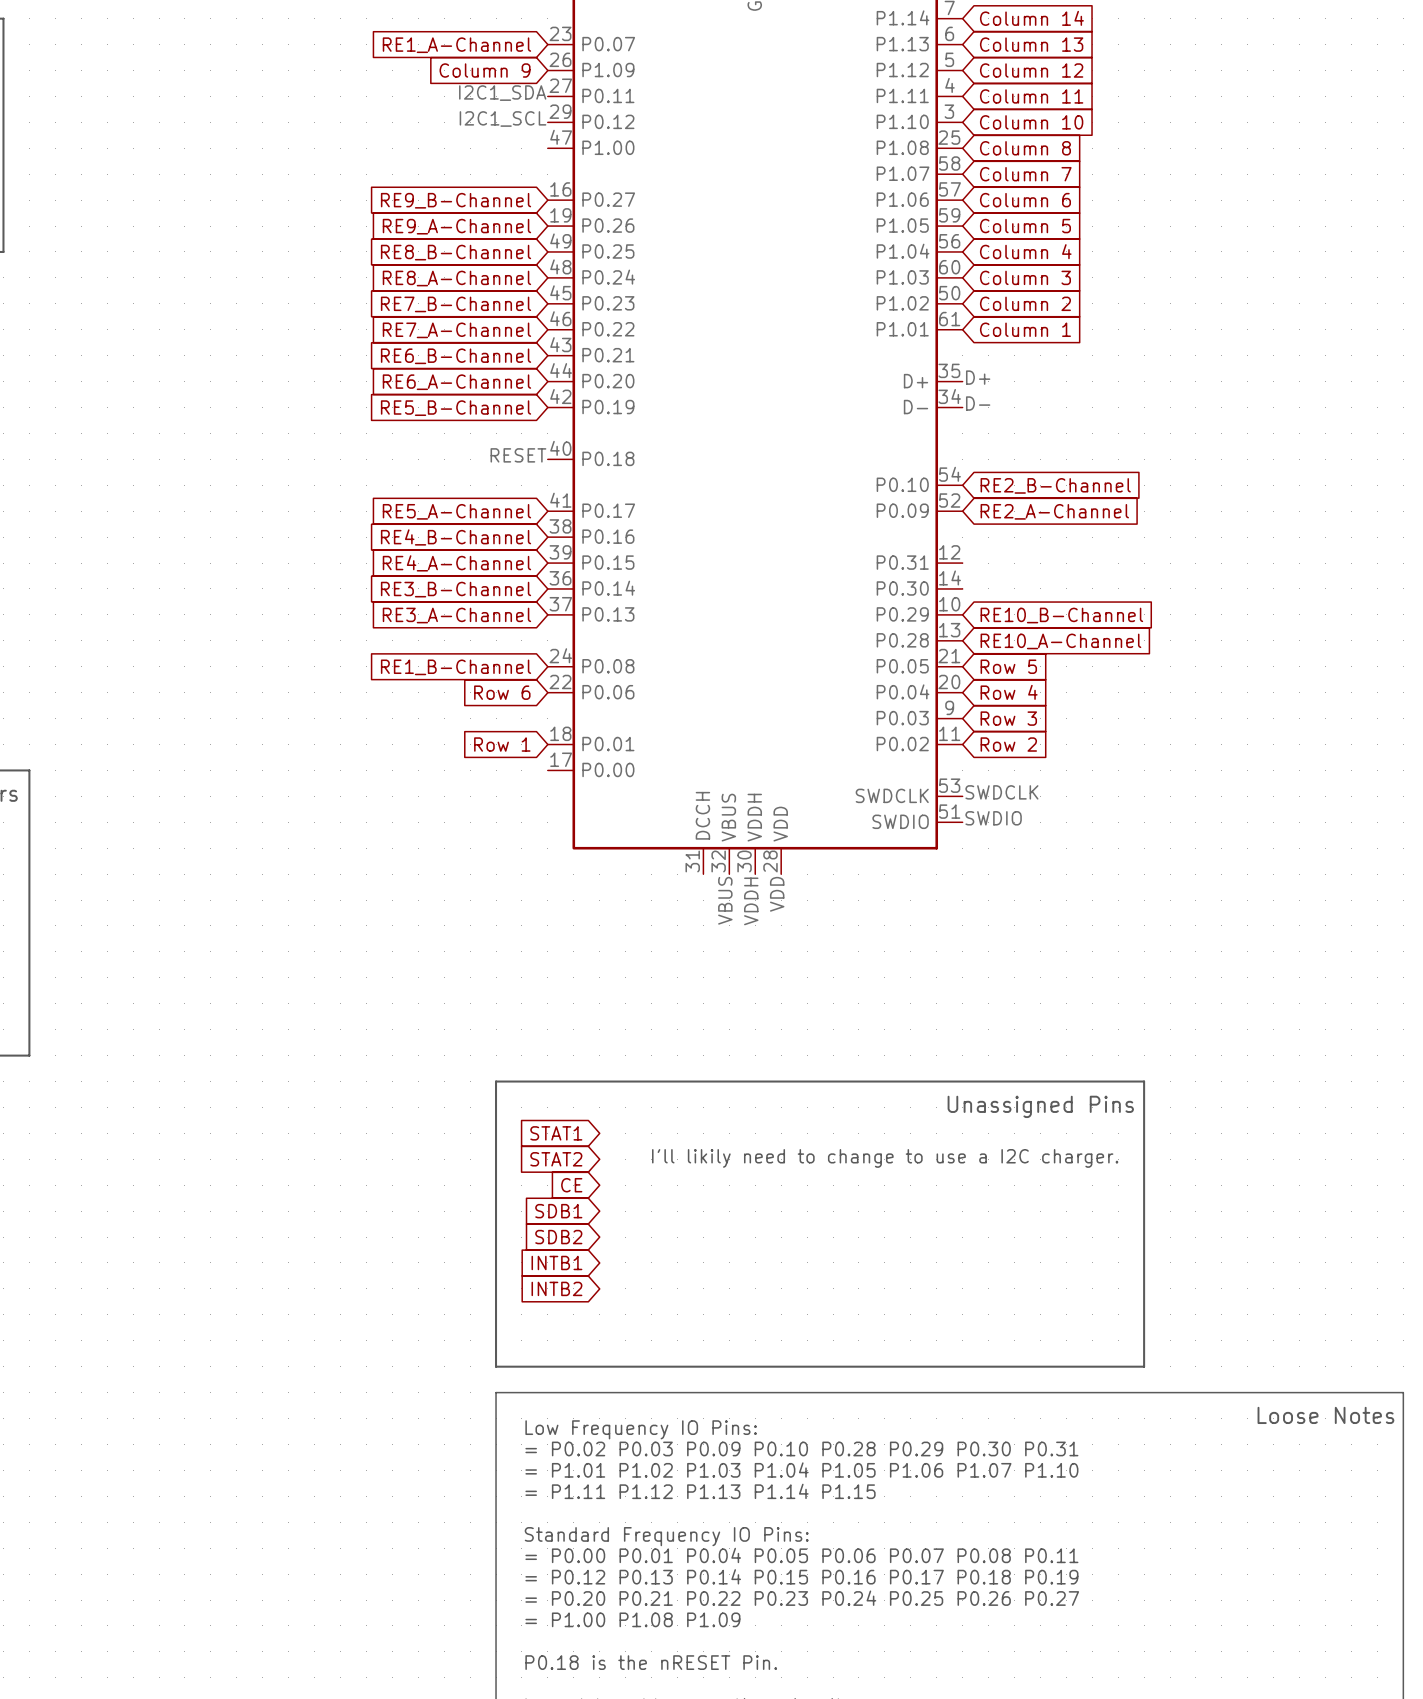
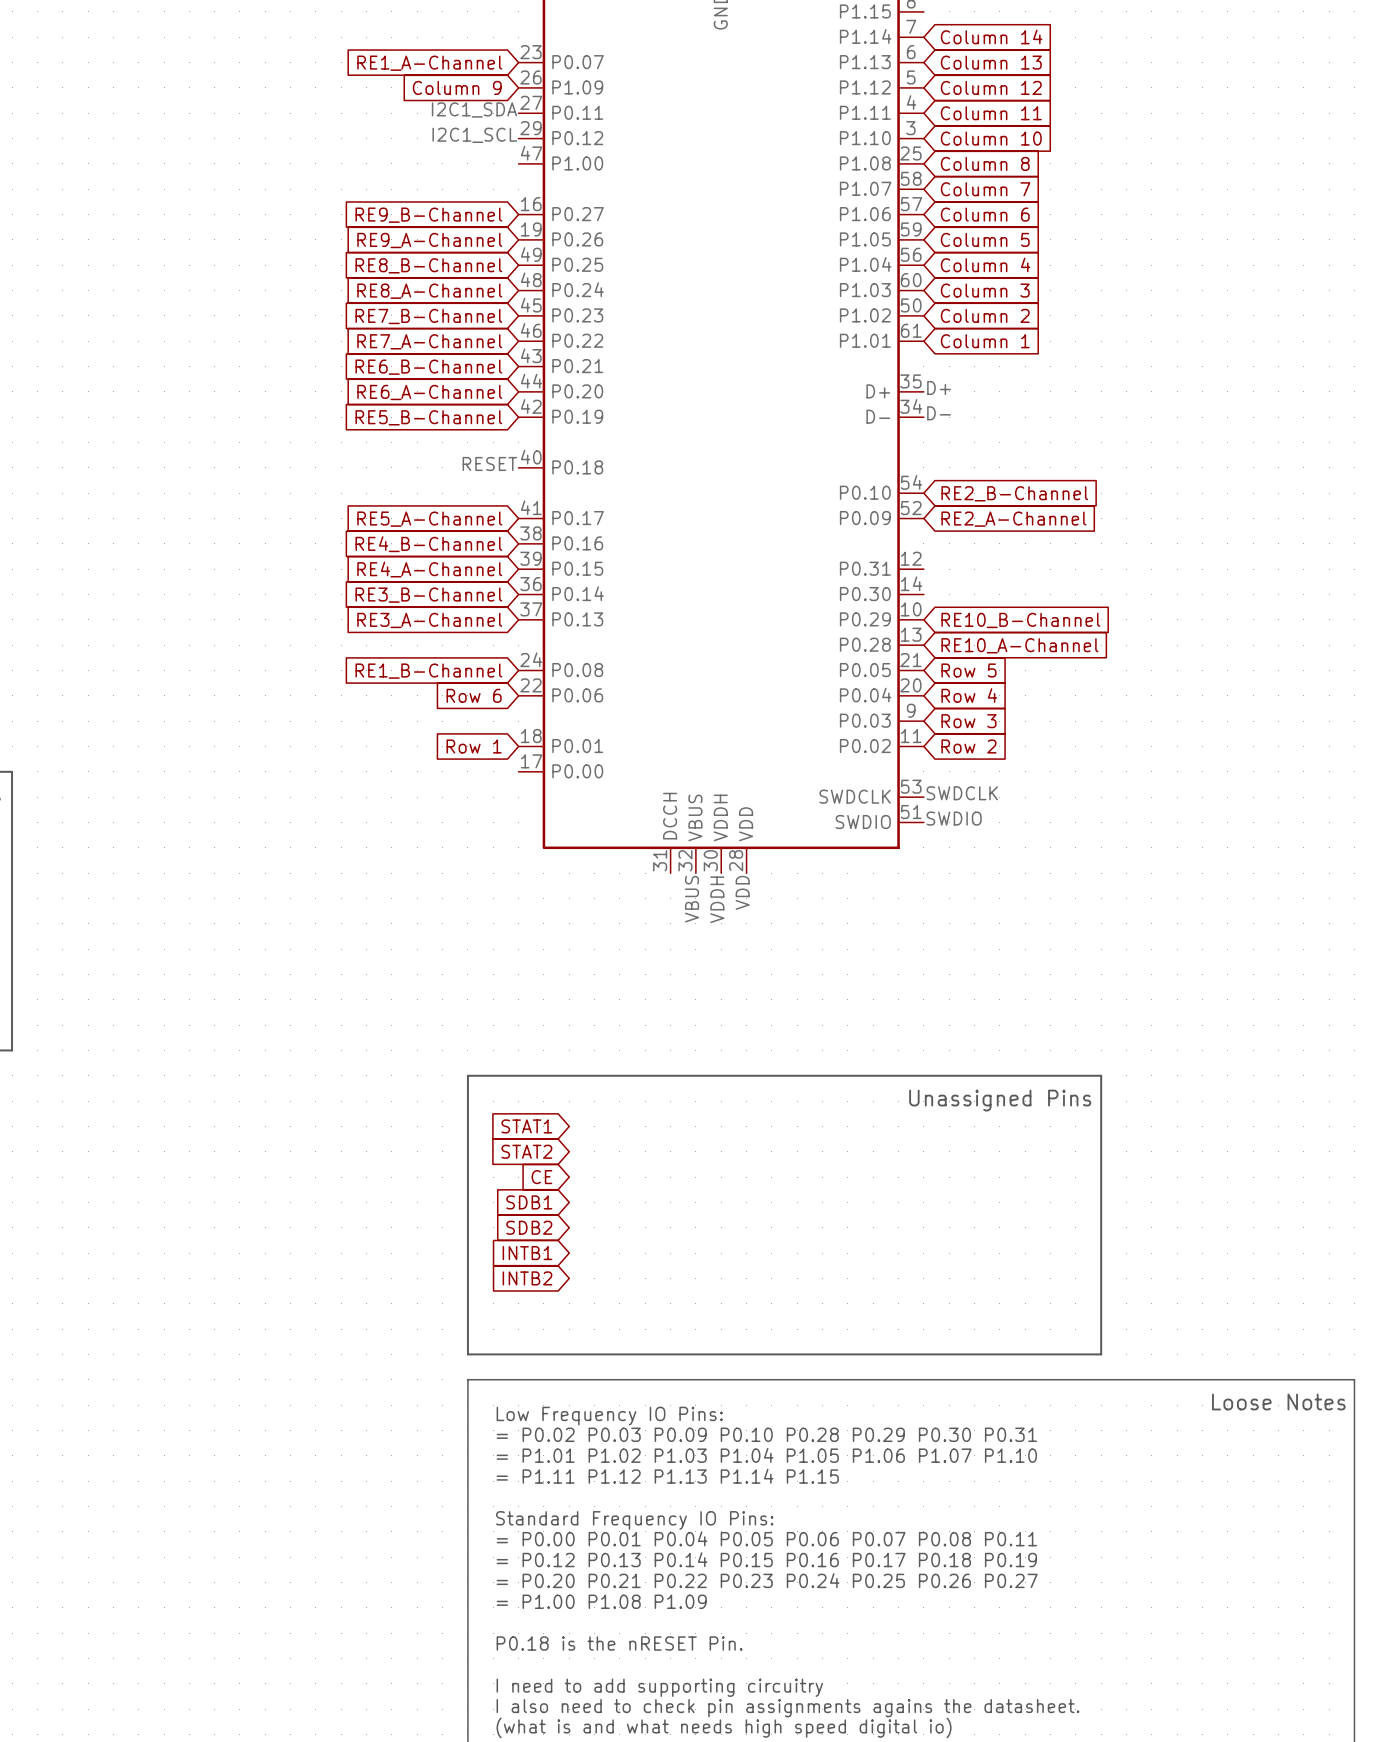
text: I'll likily need to change to use a I2C charger. (885, 1158) -> none

